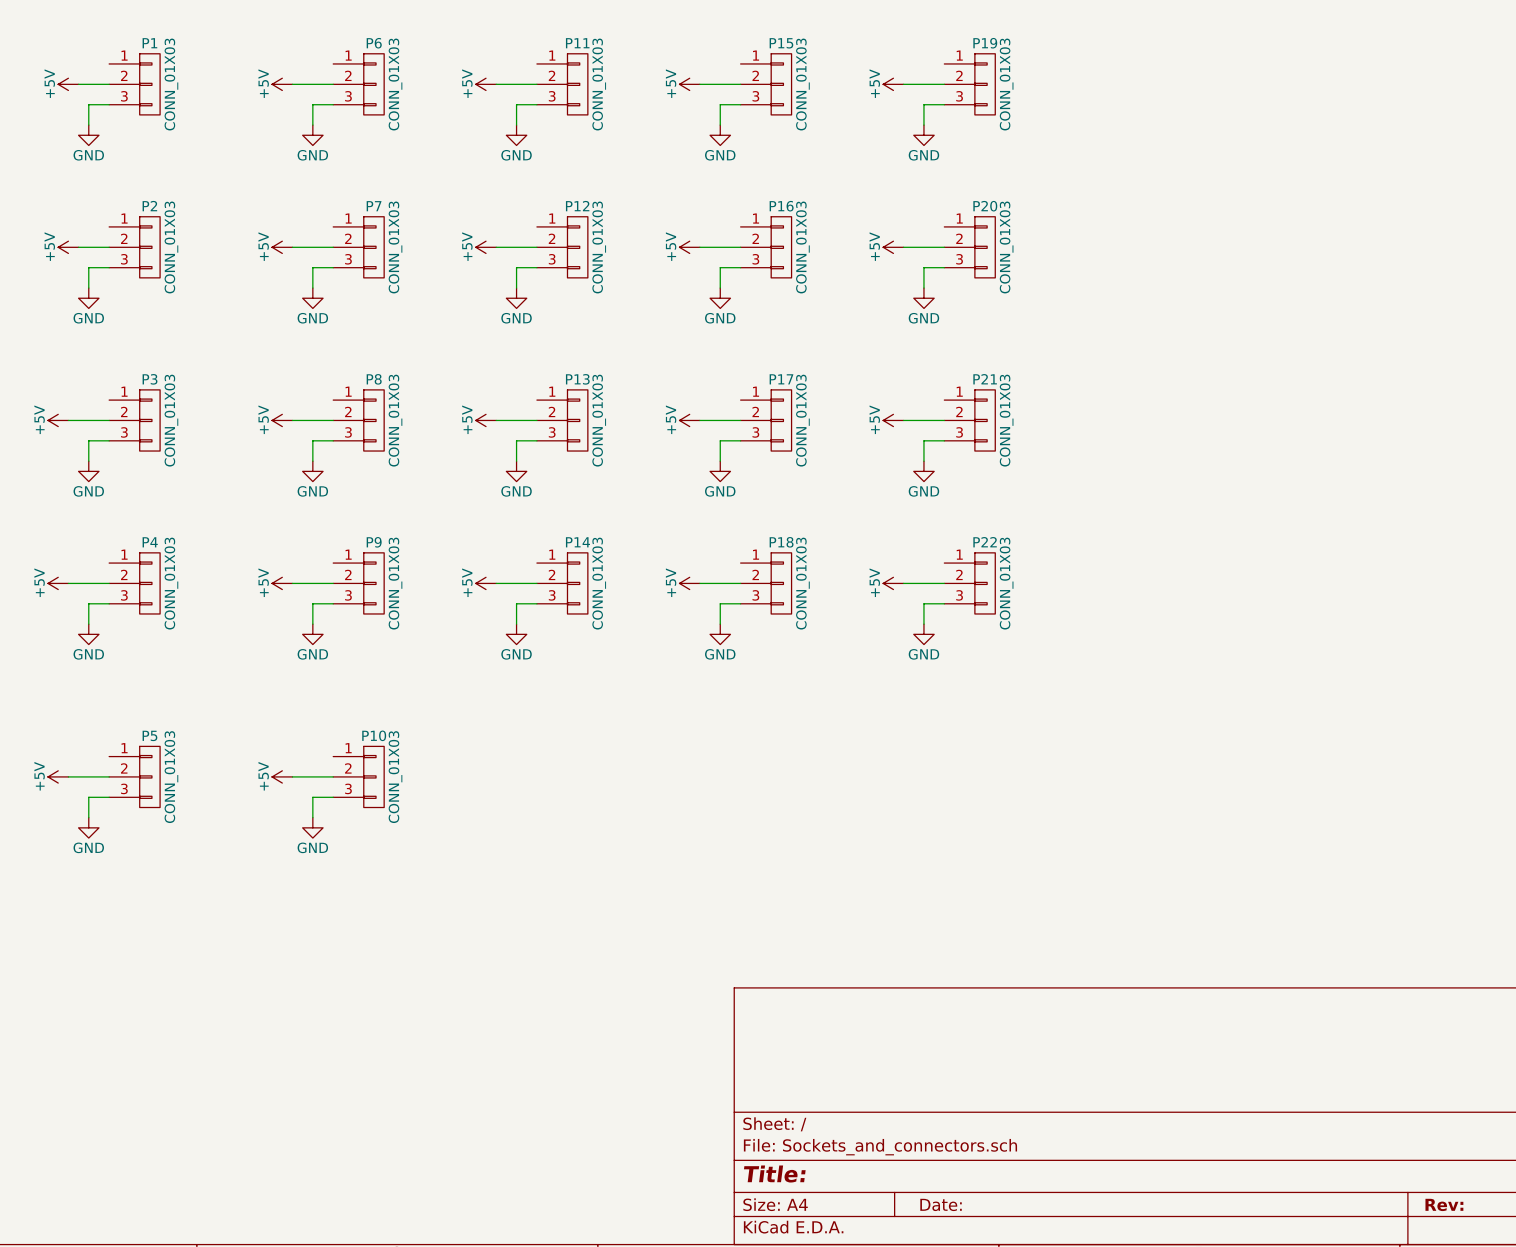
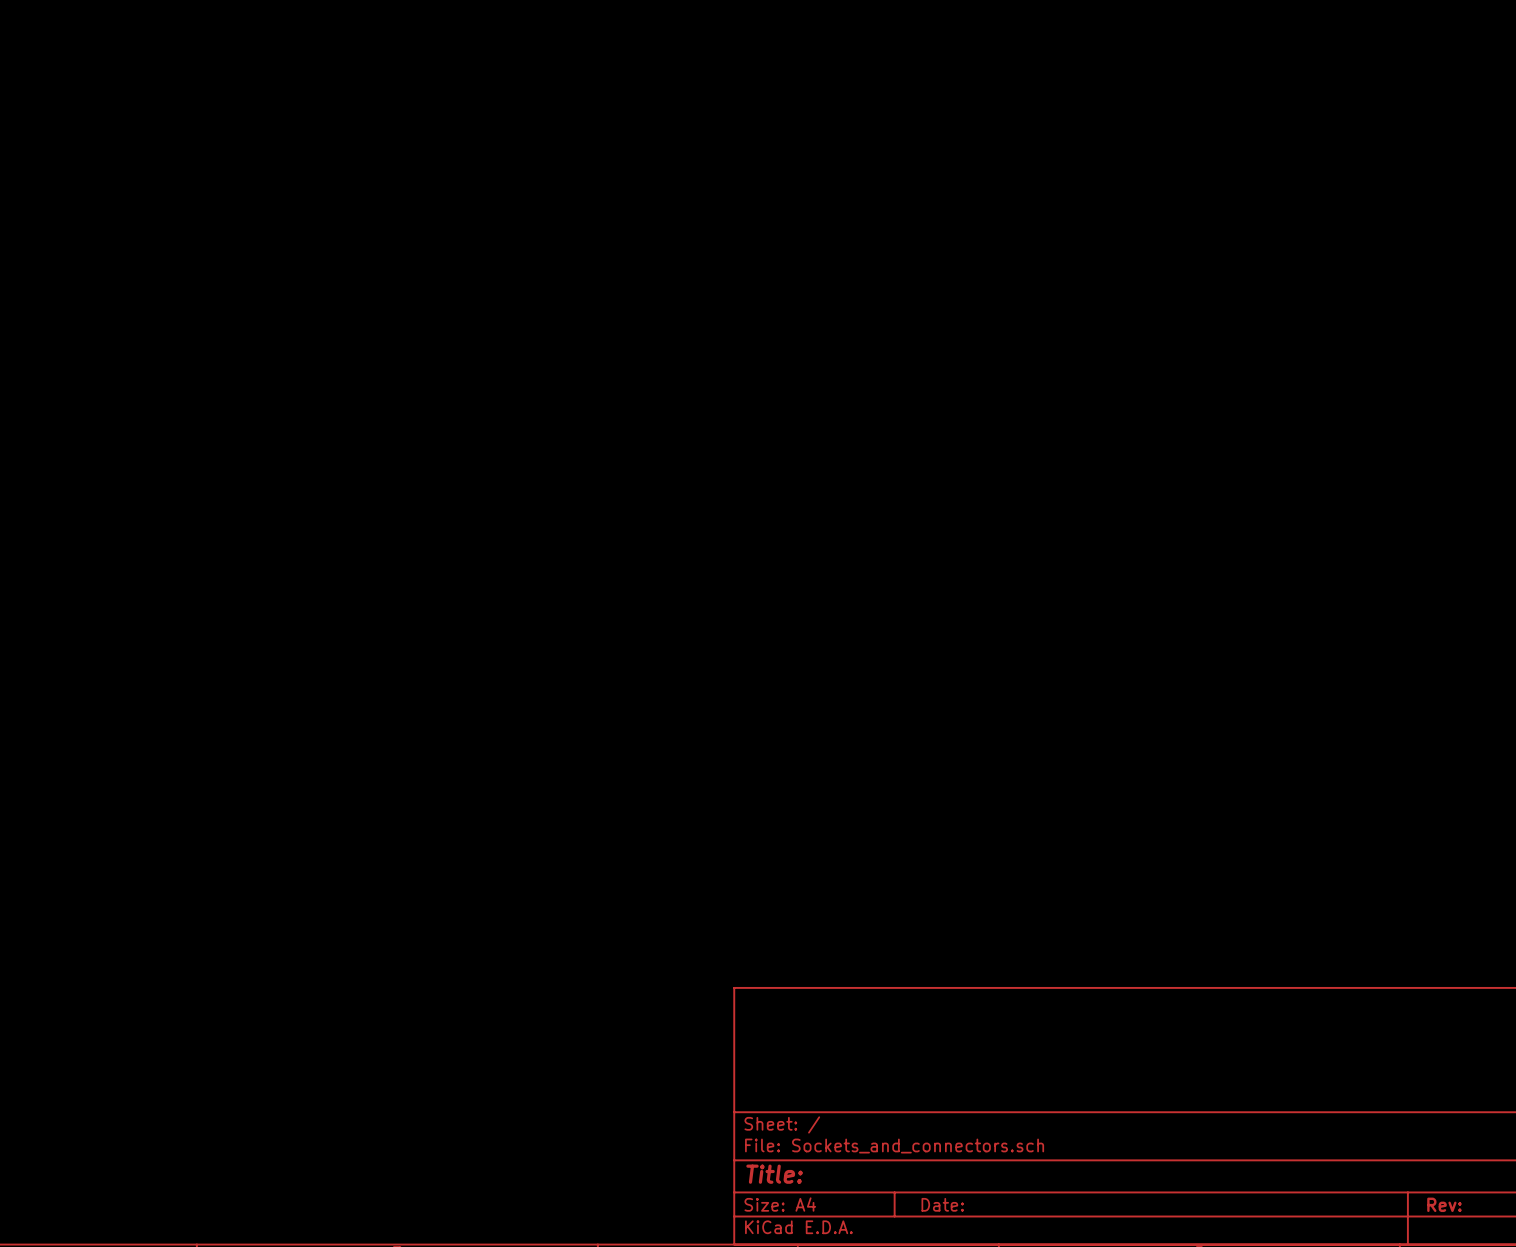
power symbol: +5V (68, 84) -> none
wire: (78, 84) (109, 84) -> none
P1: CONN_01X03 (134, 84) -> none
power symbol: +5V (282, 84) -> none
wire: (292, 84) (333, 84) -> none
P6: CONN_01X03 (358, 84) -> none
power symbol: +5V (486, 84) -> none
wire: (496, 84) (536, 84) -> none
P11: CONN_01X03 (562, 84) -> none
power symbol: +5V (689, 84) -> none
wire: (699, 84) (740, 84) -> none
P15: CONN_01X03 (766, 84) -> none
power symbol: +5V (893, 84) -> none
wire: (903, 84) (944, 84) -> none
P19: CONN_01X03 (969, 84) -> none
wire: (109, 104) (88, 104) (88, 125) -> none
wire: (333, 104) (312, 104) (312, 125) -> none
wire: (536, 104) (516, 104) (516, 125) -> none
wire: (740, 104) (720, 104) (720, 125) -> none
wire: (944, 104) (923, 104) (923, 125) -> none
power symbol: GND (88, 135) -> none
power symbol: GND (312, 135) -> none
power symbol: GND (516, 135) -> none
power symbol: GND (720, 135) -> none
power symbol: GND (923, 135) -> none
power symbol: +5V (68, 247) -> none
wire: (78, 247) (109, 247) -> none
P2: CONN_01X03 (134, 247) -> none
power symbol: +5V (282, 247) -> none
wire: (292, 247) (333, 247) -> none
P7: CONN_01X03 (358, 247) -> none
power symbol: +5V (486, 247) -> none
wire: (496, 247) (536, 247) -> none
P12: CONN_01X03 (562, 247) -> none
power symbol: +5V (689, 247) -> none
wire: (699, 247) (740, 247) -> none
P16: CONN_01X03 (766, 247) -> none
power symbol: +5V (893, 247) -> none
wire: (903, 247) (944, 247) -> none
P20: CONN_01X03 (969, 247) -> none
wire: (109, 267) (88, 267) (88, 288) -> none
wire: (333, 267) (312, 267) (312, 288) -> none
wire: (536, 267) (516, 267) (516, 288) -> none
wire: (740, 267) (720, 267) (720, 288) -> none
wire: (944, 267) (923, 267) (923, 288) -> none
power symbol: GND (88, 298) -> none
power symbol: GND (312, 298) -> none
power symbol: GND (516, 298) -> none
power symbol: GND (720, 298) -> none
power symbol: GND (923, 298) -> none
power symbol: +5V (58, 420) -> none
wire: (68, 420) (109, 420) -> none
P3: CONN_01X03 (134, 420) -> none
power symbol: +5V (282, 420) -> none
wire: (292, 420) (333, 420) -> none
P8: CONN_01X03 (358, 420) -> none
power symbol: +5V (486, 420) -> none
wire: (496, 420) (536, 420) -> none
P13: CONN_01X03 (562, 420) -> none
power symbol: +5V (689, 420) -> none
wire: (699, 420) (740, 420) -> none
P17: CONN_01X03 (766, 420) -> none
power symbol: +5V (893, 420) -> none
wire: (903, 420) (944, 420) -> none
P21: CONN_01X03 (969, 420) -> none
wire: (109, 440) (88, 440) (88, 461) -> none
wire: (333, 440) (312, 440) (312, 461) -> none
wire: (536, 440) (516, 440) (516, 461) -> none
wire: (740, 440) (720, 440) (720, 461) -> none
wire: (944, 440) (923, 440) (923, 461) -> none
power symbol: GND (88, 471) -> none
power symbol: GND (312, 471) -> none
power symbol: GND (516, 471) -> none
power symbol: GND (720, 471) -> none
power symbol: GND (923, 471) -> none
power symbol: +5V (58, 583) -> none
wire: (68, 583) (109, 583) -> none
P4: CONN_01X03 (134, 583) -> none
power symbol: +5V (282, 583) -> none
wire: (292, 583) (333, 583) -> none
P9: CONN_01X03 (358, 583) -> none
power symbol: +5V (486, 583) -> none
wire: (496, 583) (536, 583) -> none
P14: CONN_01X03 (562, 583) -> none
power symbol: +5V (689, 583) -> none
wire: (699, 583) (740, 583) -> none
P18: CONN_01X03 (766, 583) -> none
power symbol: +5V (893, 583) -> none
wire: (903, 583) (944, 583) -> none
P22: CONN_01X03 (969, 583) -> none
wire: (109, 603) (88, 603) (88, 624) -> none
wire: (333, 603) (312, 603) (312, 624) -> none
wire: (536, 603) (516, 603) (516, 624) -> none
wire: (740, 603) (720, 603) (720, 624) -> none
wire: (944, 603) (923, 603) (923, 624) -> none
power symbol: GND (88, 634) -> none
power symbol: GND (312, 634) -> none
power symbol: GND (516, 634) -> none
power symbol: GND (720, 634) -> none
power symbol: GND (923, 634) -> none
power symbol: +5V (58, 776) -> none
wire: (68, 776) (109, 776) -> none
P5: CONN_01X03 (134, 776) -> none
power symbol: +5V (282, 776) -> none
wire: (292, 776) (333, 776) -> none
P10: CONN_01X03 (358, 776) -> none
wire: (109, 797) (88, 797) (88, 817) -> none
wire: (333, 797) (312, 797) (312, 817) -> none
power symbol: GND (88, 827) -> none
power symbol: GND (312, 827) -> none

